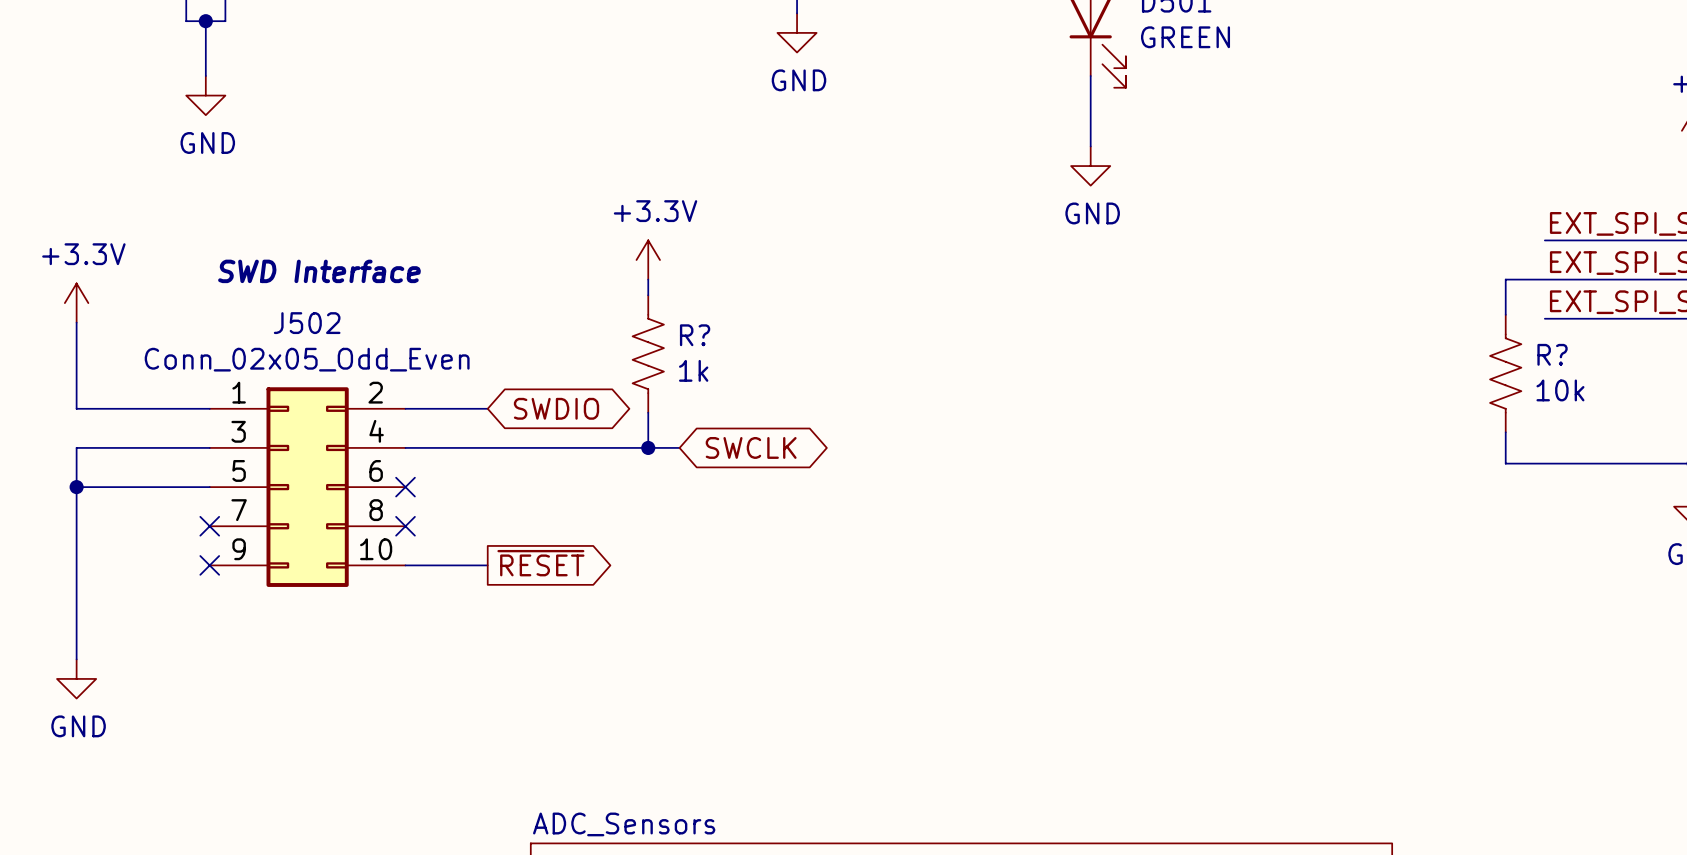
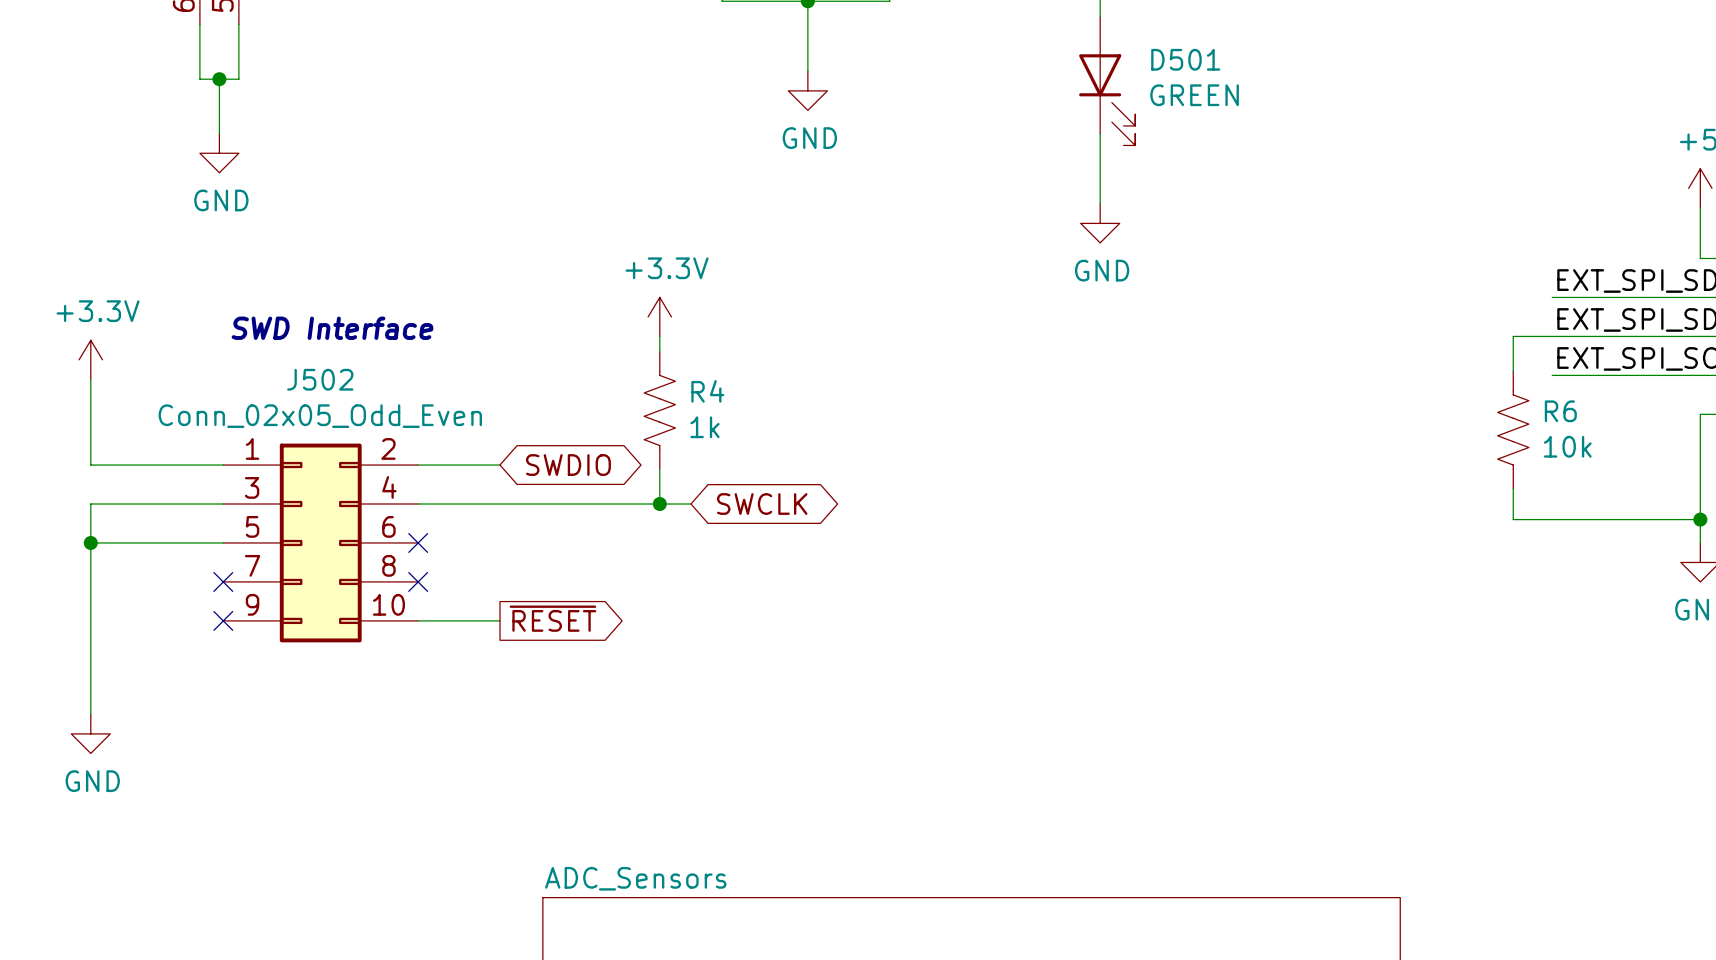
R? name: R? (695, 335) -> R4 (707, 391)
R? name: R? (1552, 354) -> R6 (1560, 411)

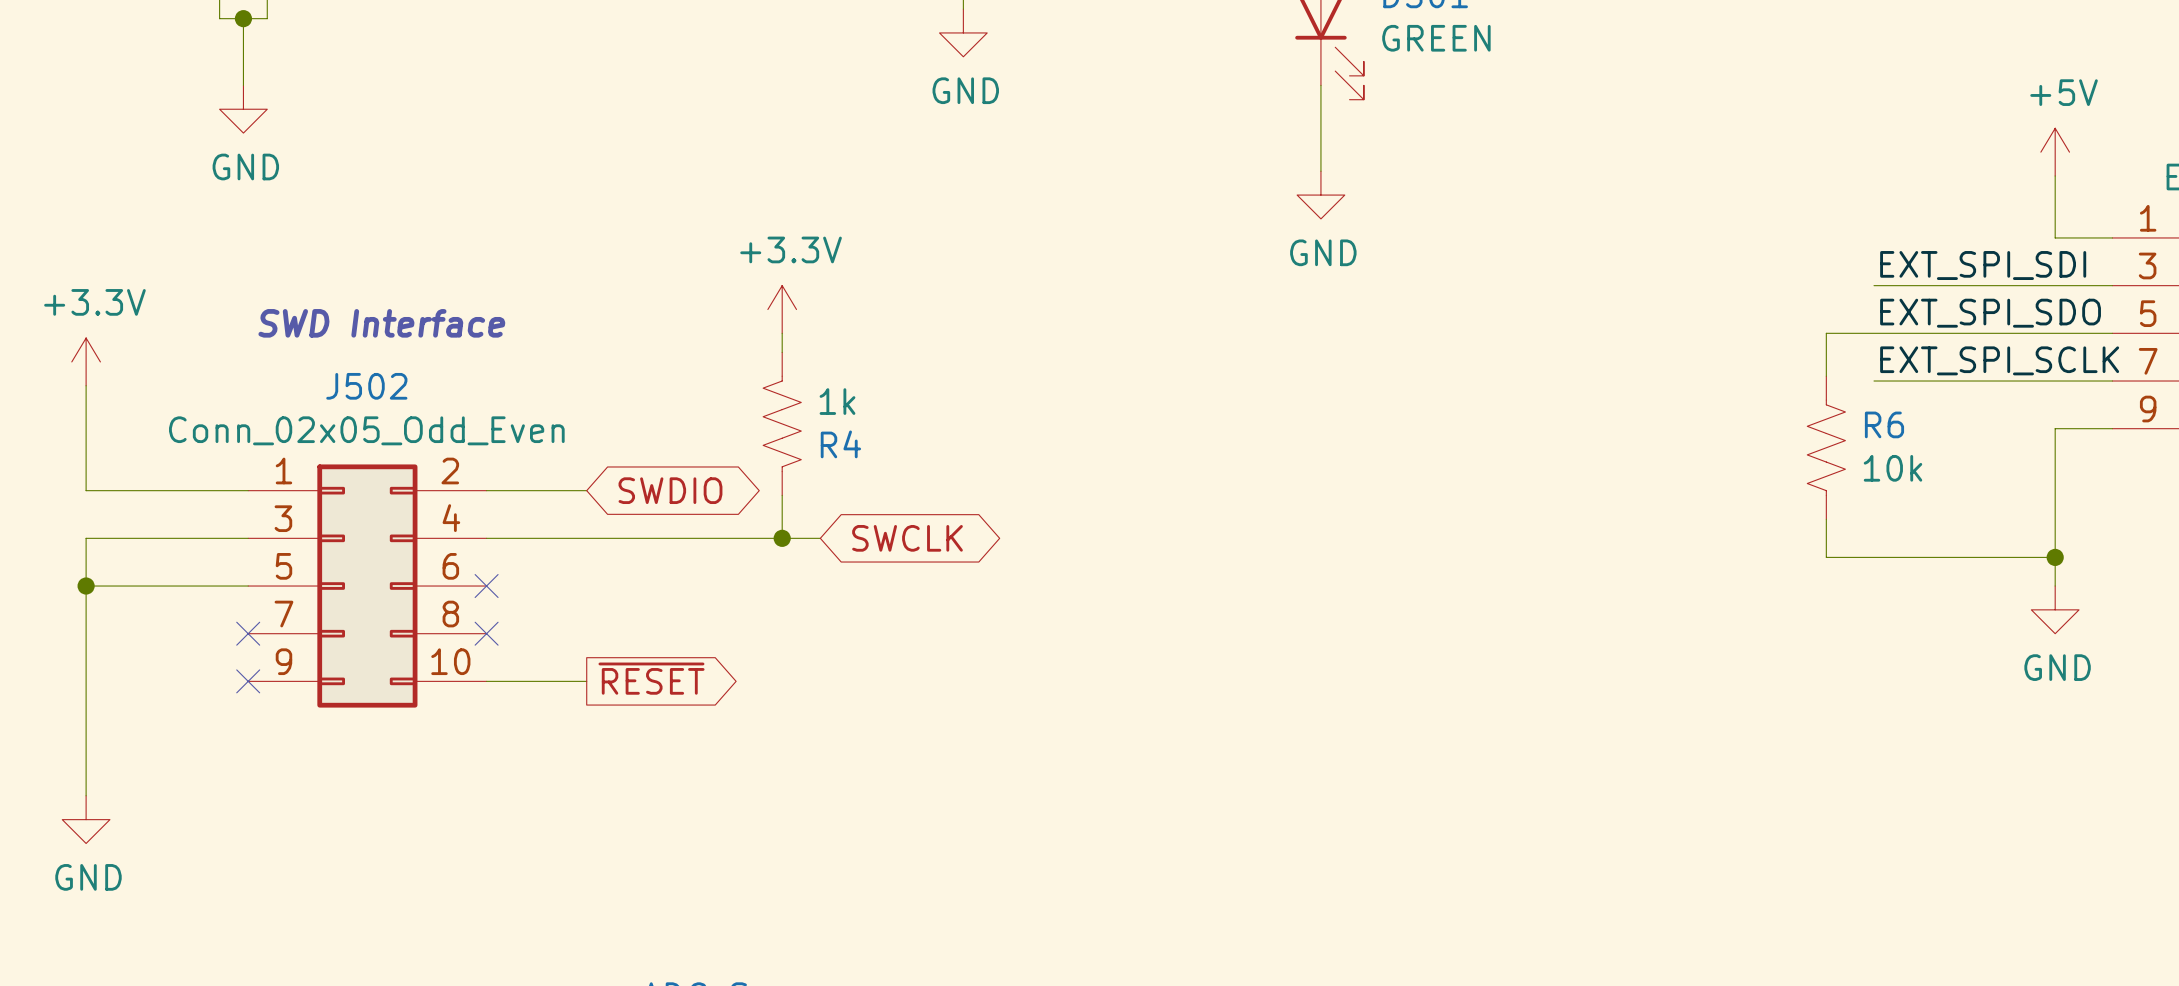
R4 name position: R4 (707, 391) -> R4 (840, 444)
R4 flip: as is (659, 410) -> left-right (782, 423)
R4 value position: 1k (704, 427) -> 1k (837, 401)

